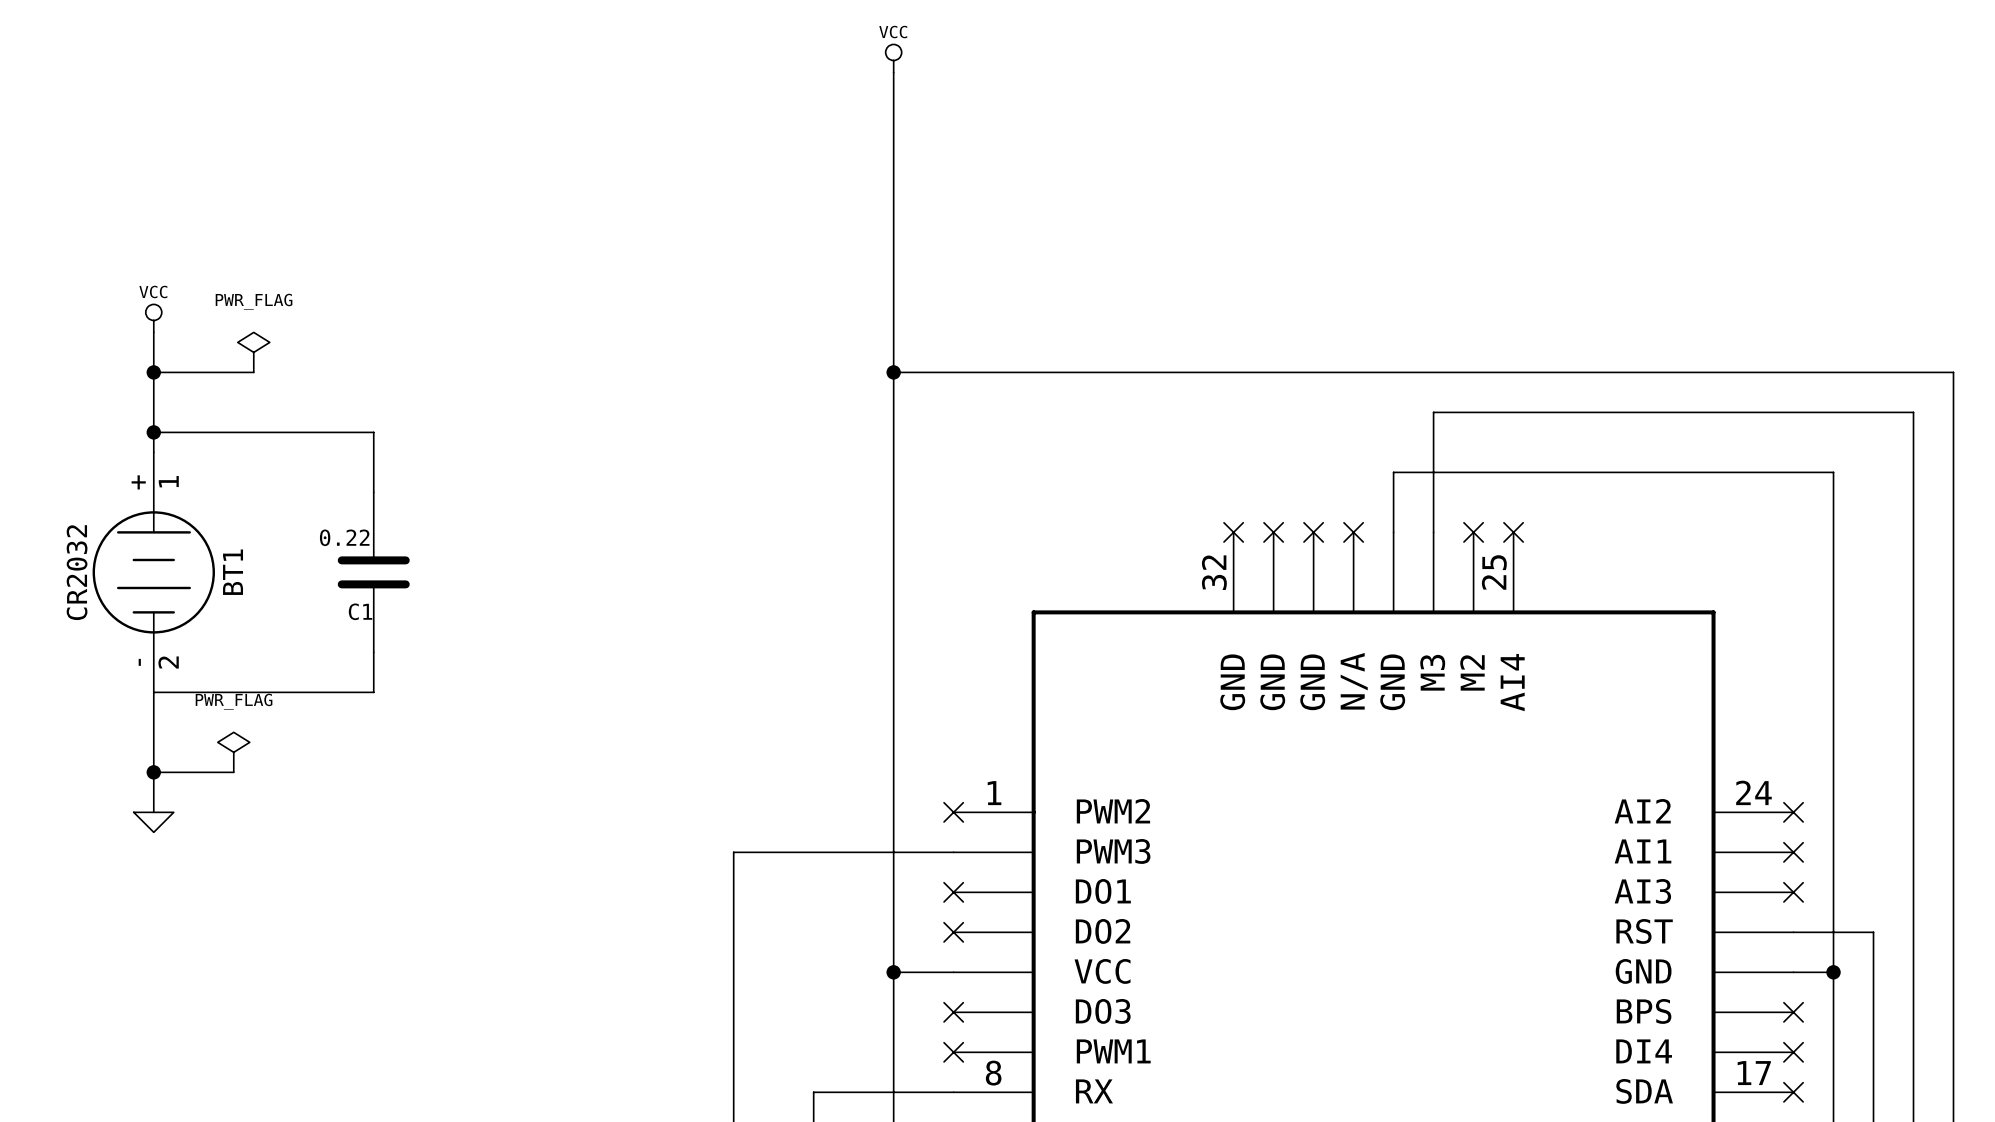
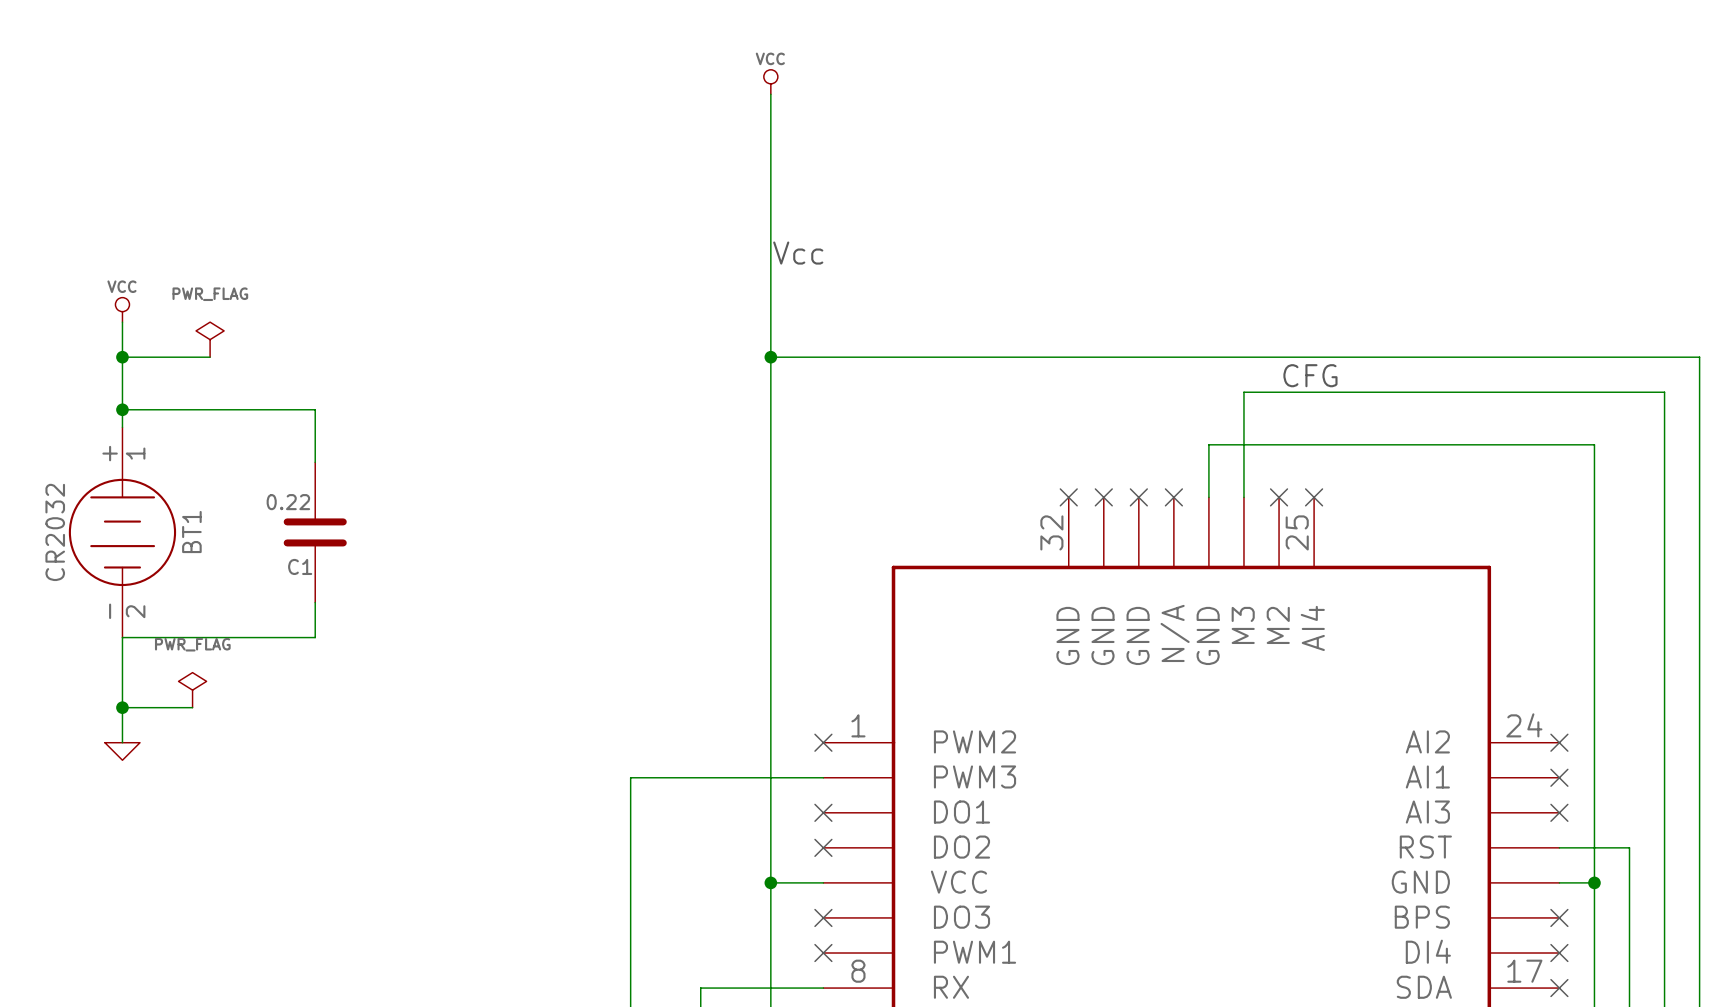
text: none -> Vcc (798, 253)
text: none -> CFG (1310, 375)

